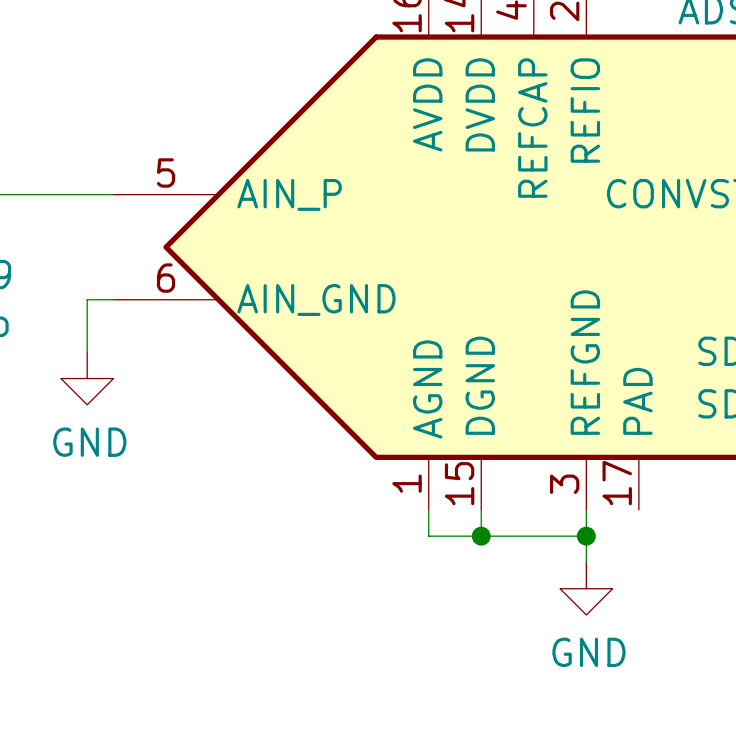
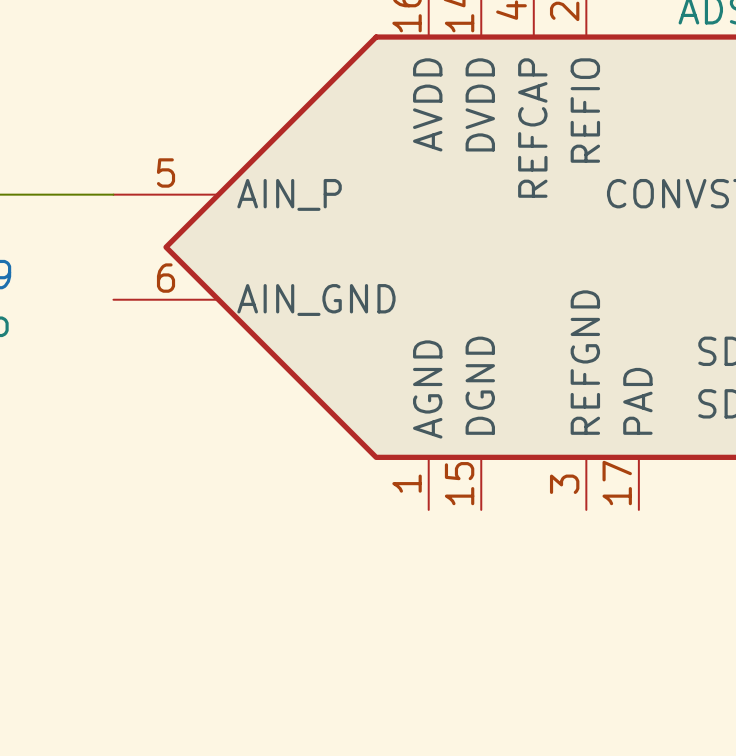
wire: (113, 299) (87, 299) (87, 352) -> none
power symbol: GND (87, 378) -> none
wire: (428, 509) (428, 536) (586, 536) -> none
wire: (481, 509) (481, 536) -> none
wire: (586, 509) (586, 562) -> none
junction: (481, 536) -> none
junction: (586, 536) -> none
power symbol: GND (586, 588) -> none

